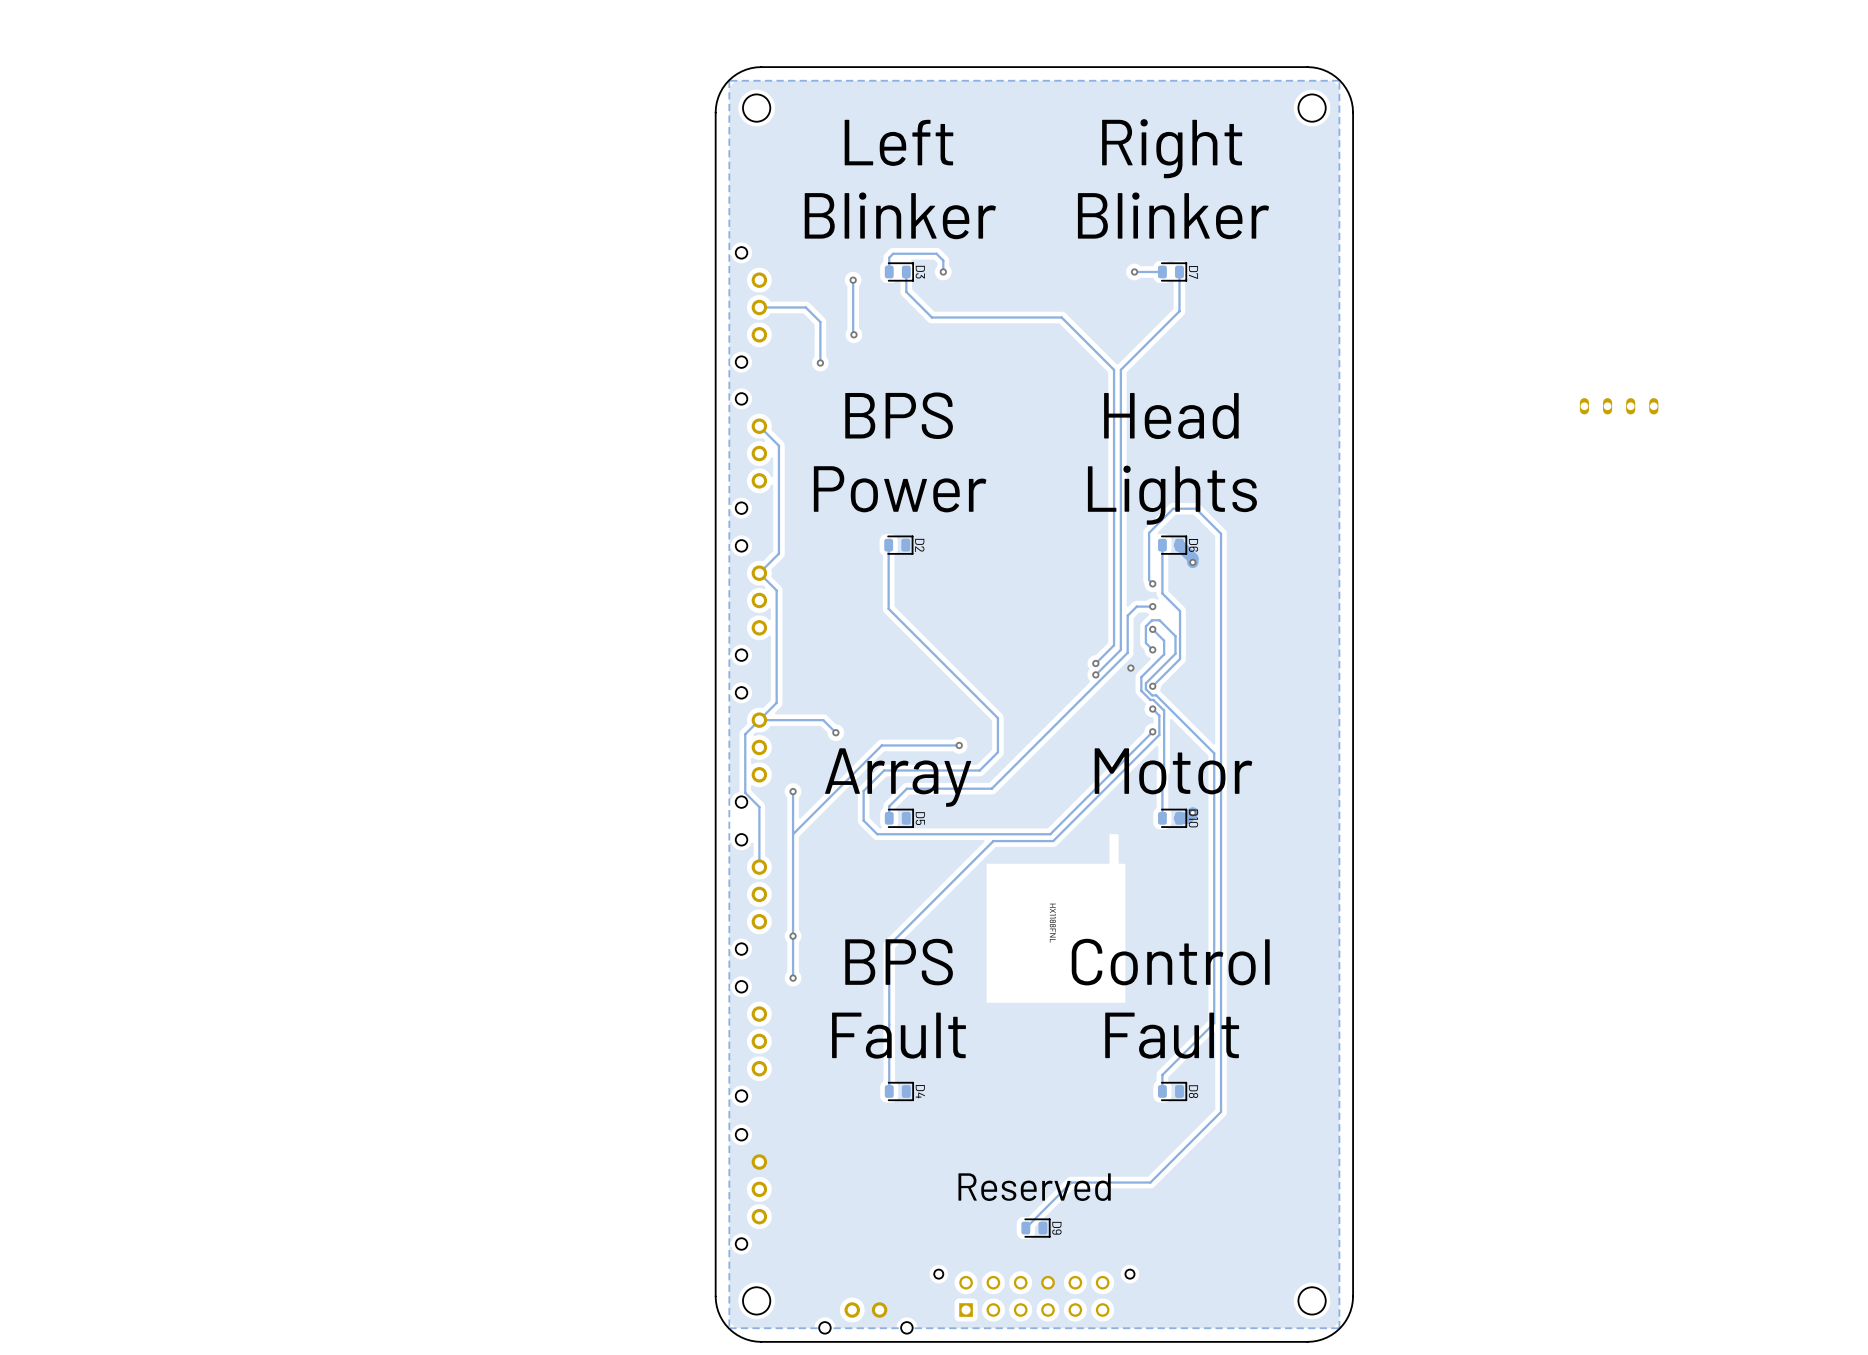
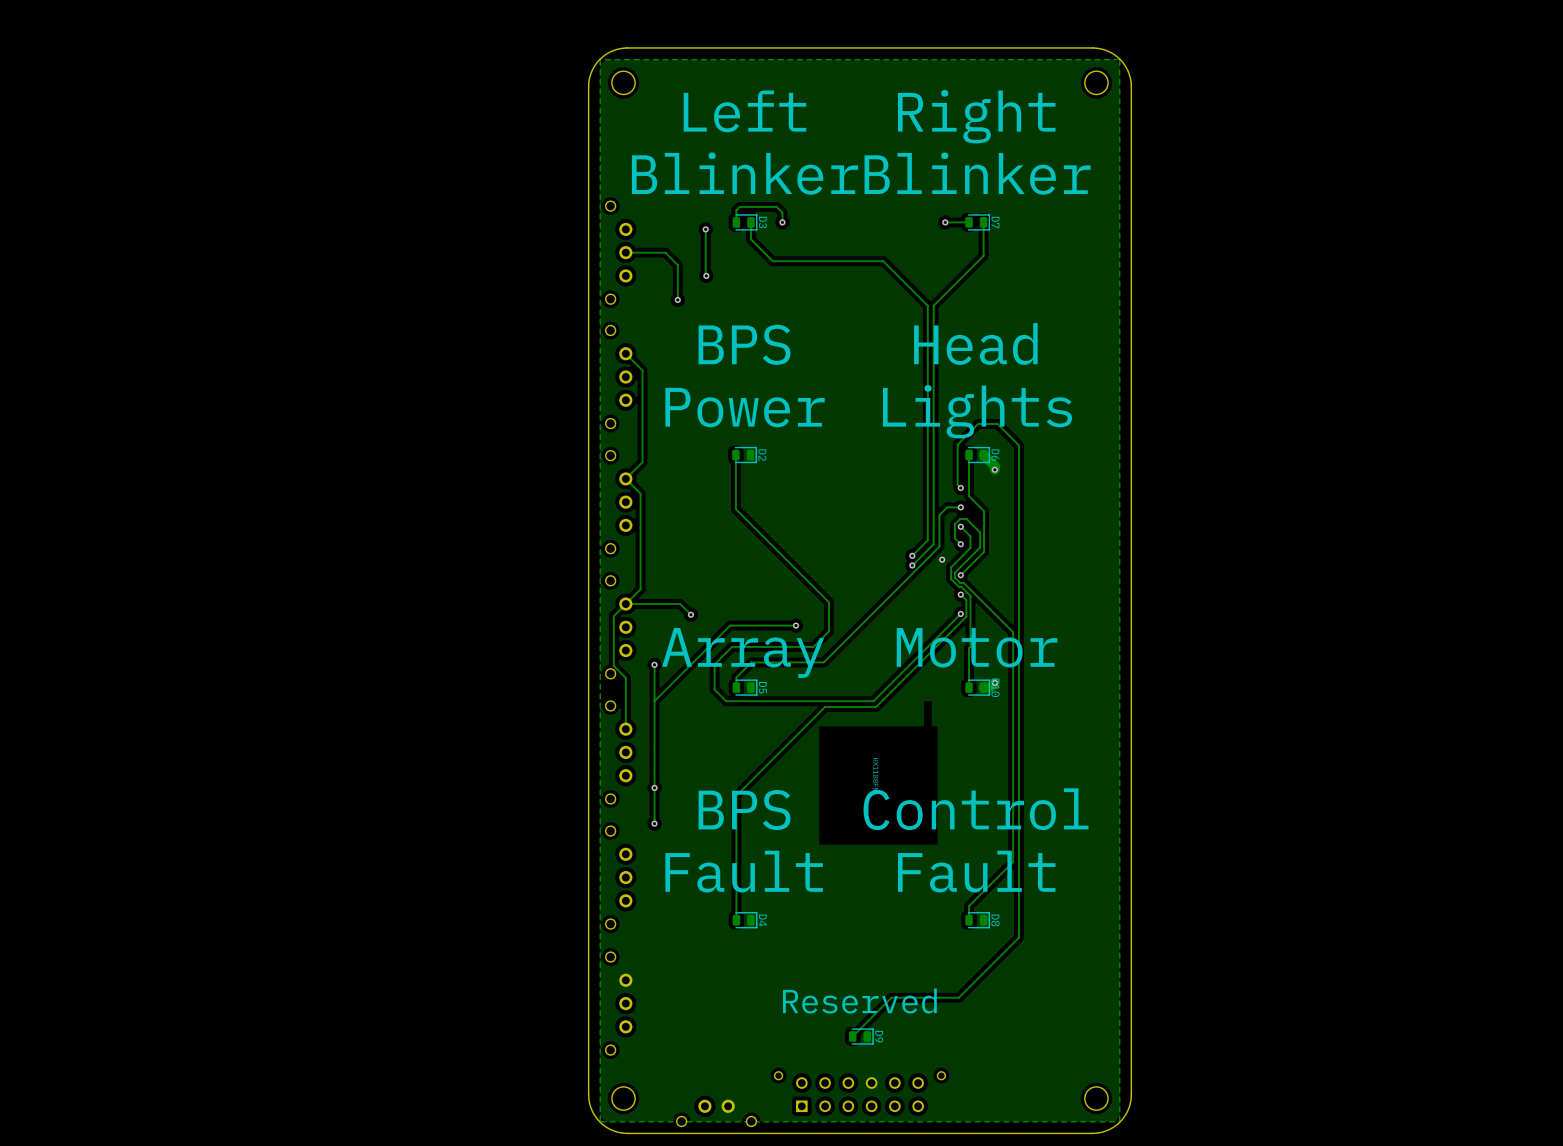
part: (1619, 406) -> none

